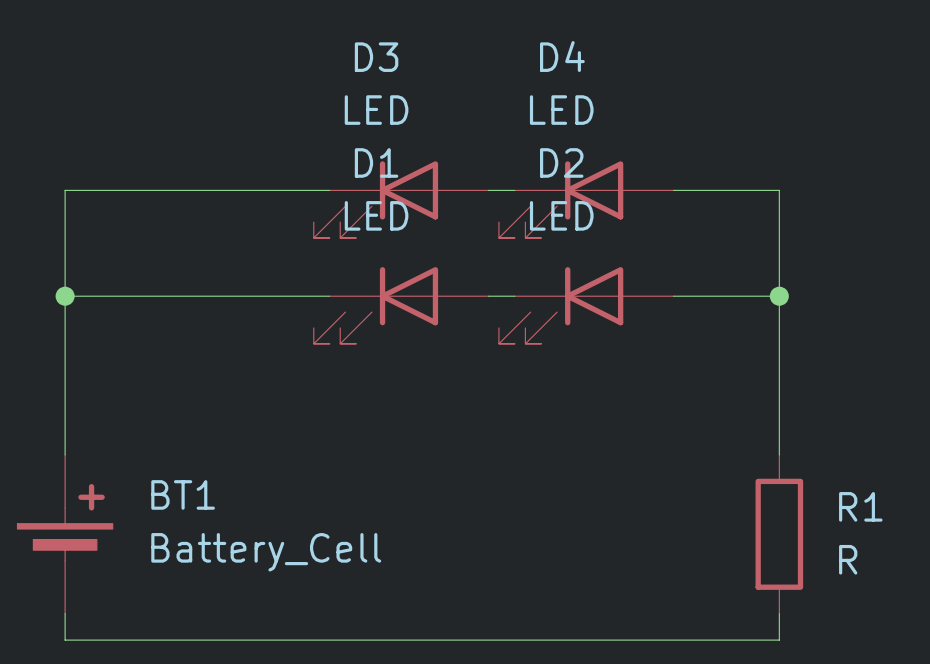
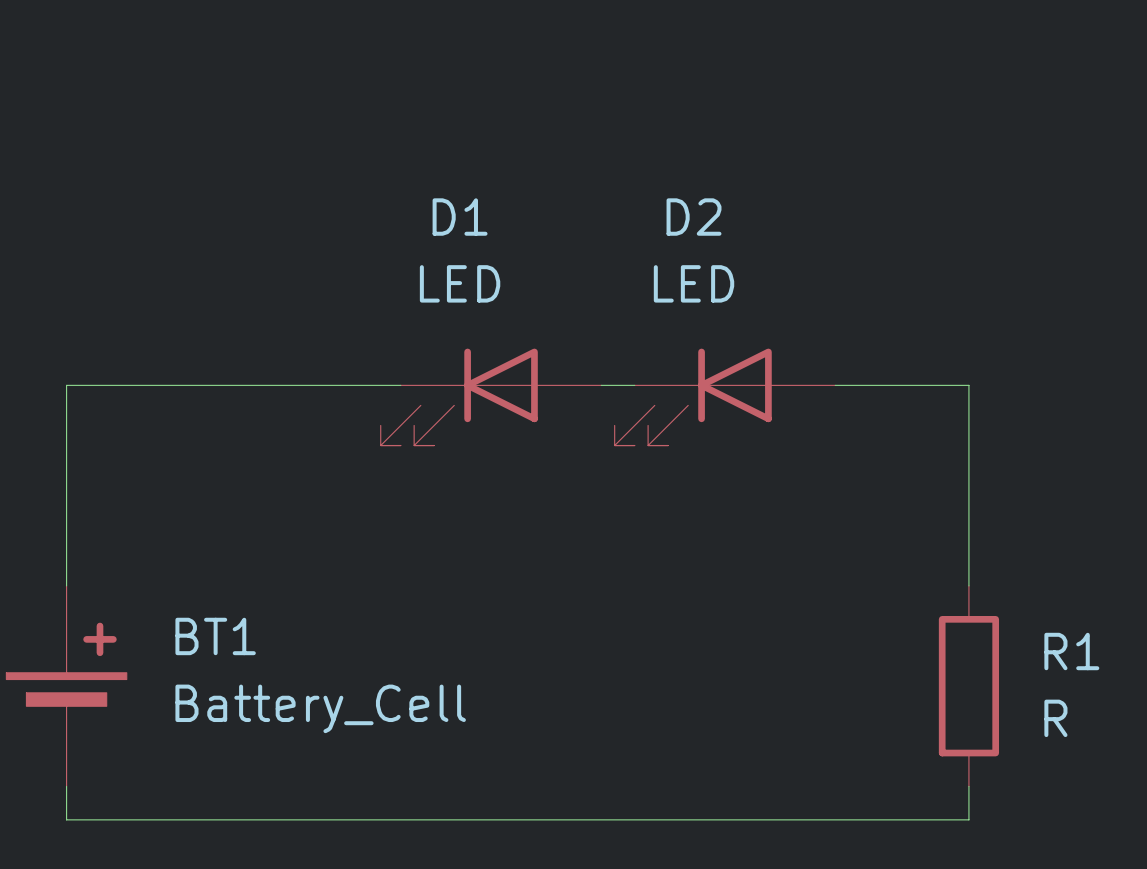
wire: (329, 190) (65, 190) (65, 296) -> none
wire: (488, 190) (514, 190) -> none
wire: (673, 190) (779, 190) (779, 296) -> none
D3: LED (401, 199) -> none
D4: LED (586, 199) -> none
junction: (65, 296) -> none
junction: (779, 296) -> none

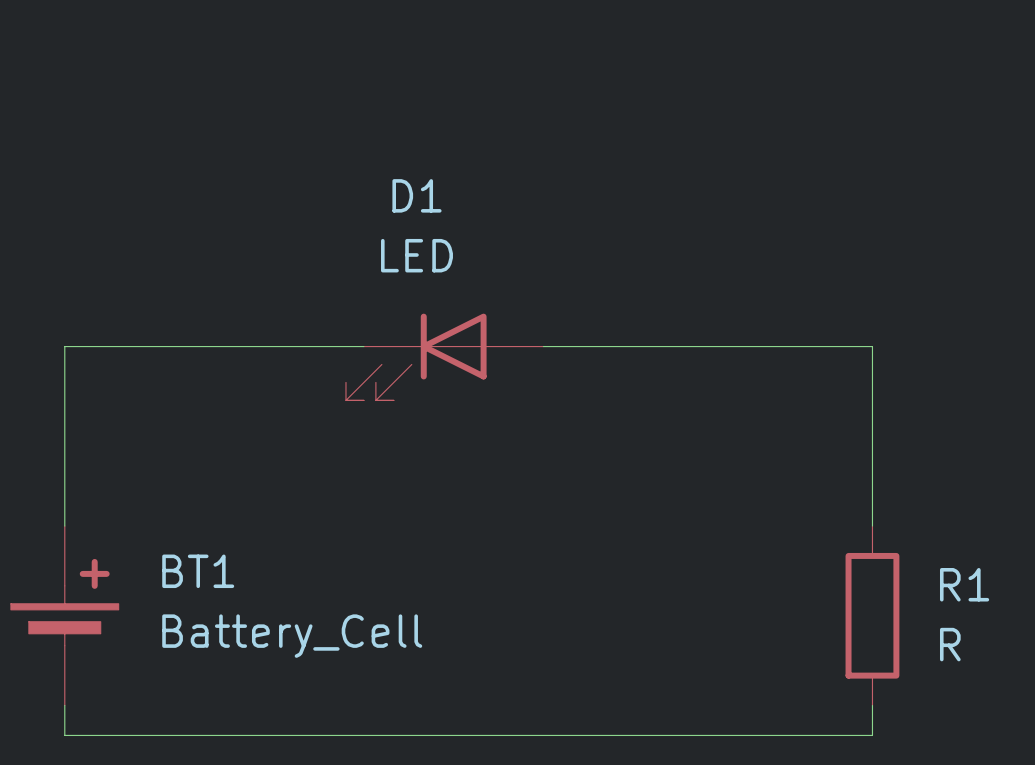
D2: LED (724, 397) -> none

